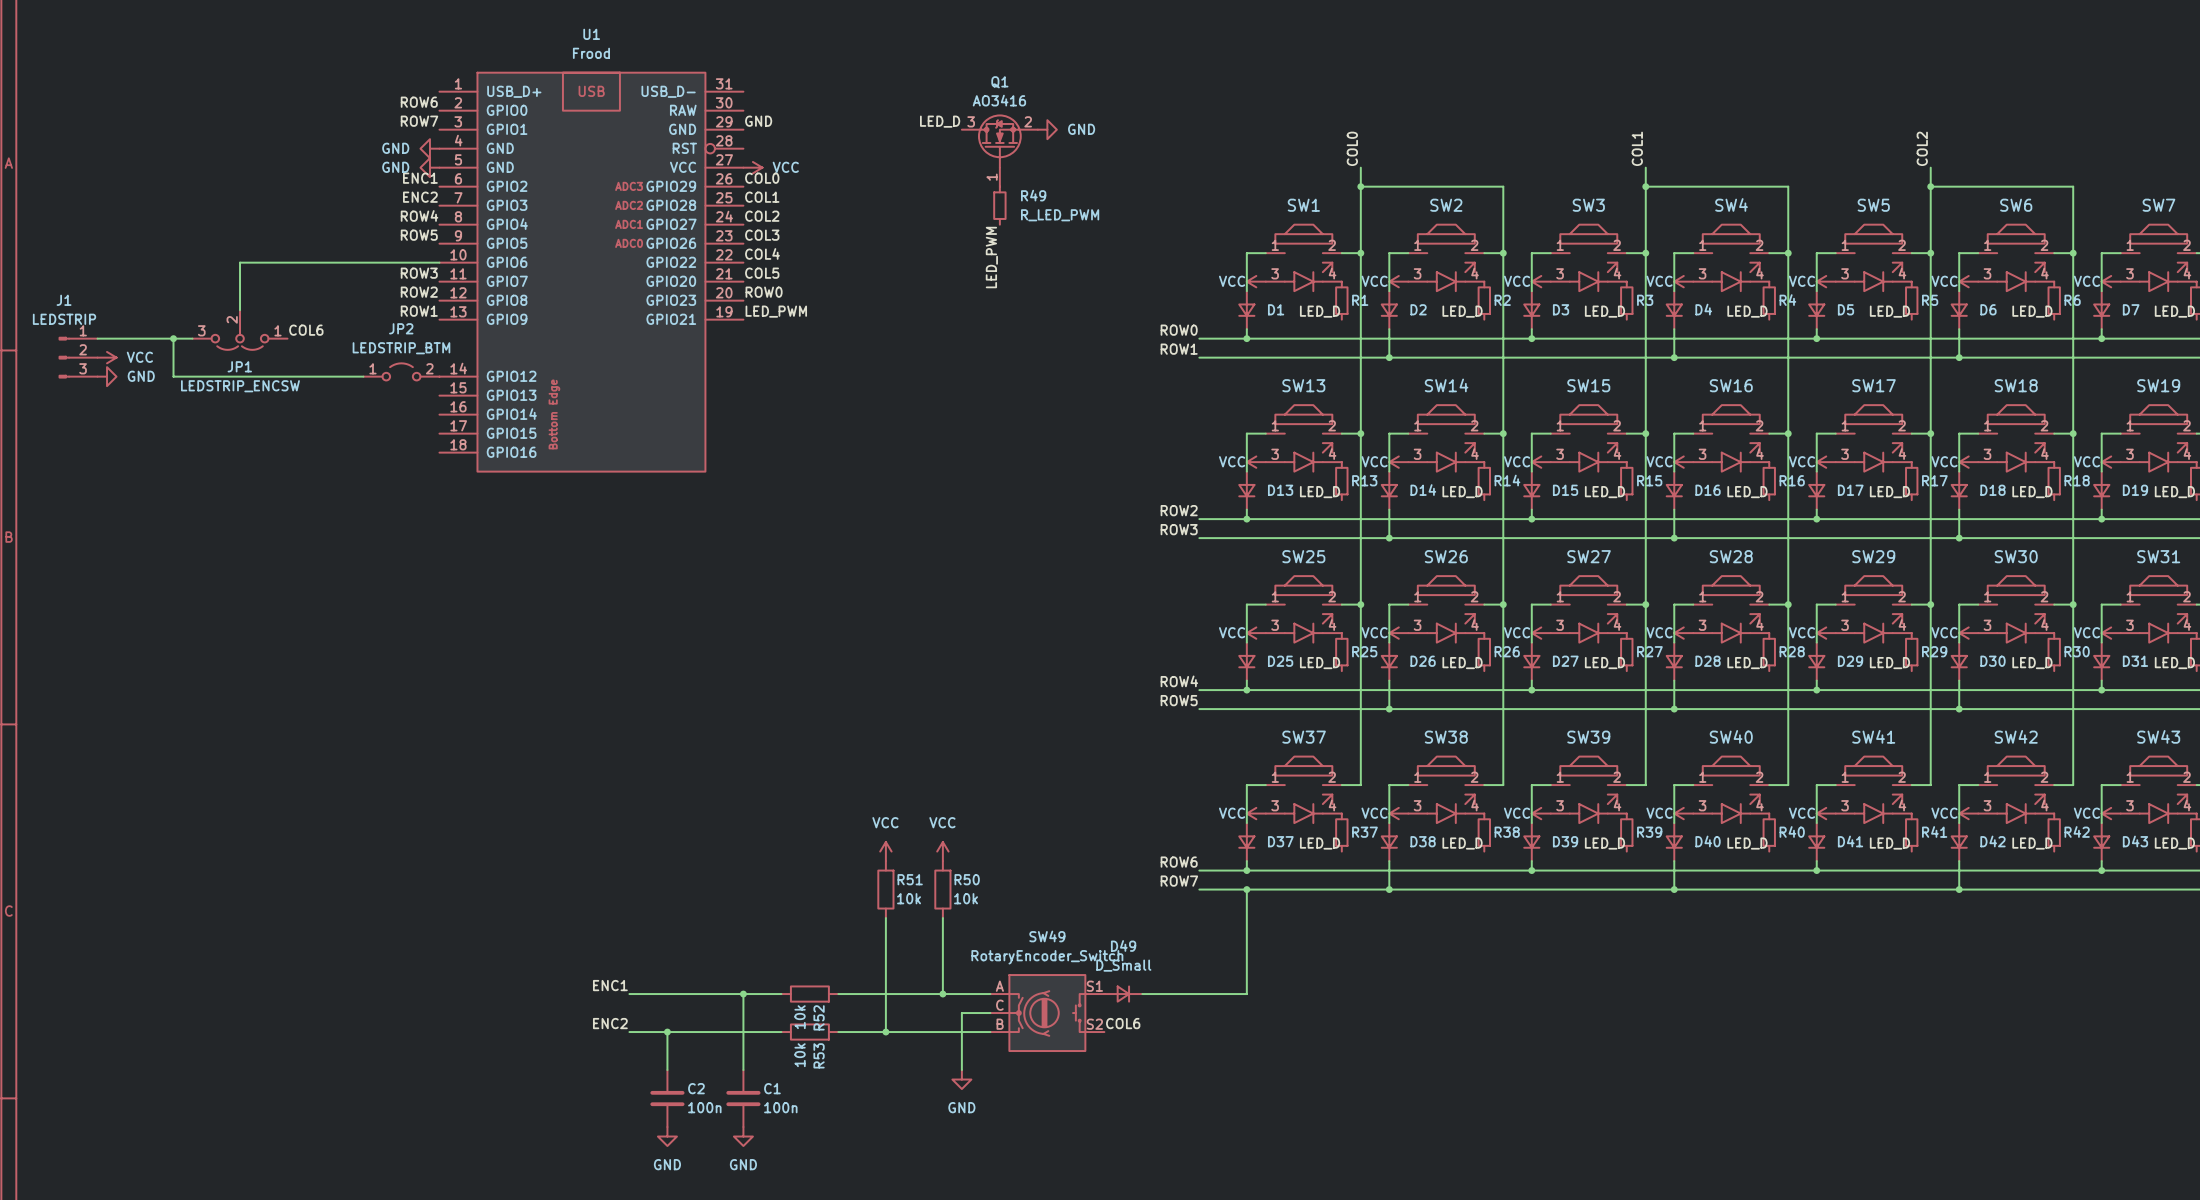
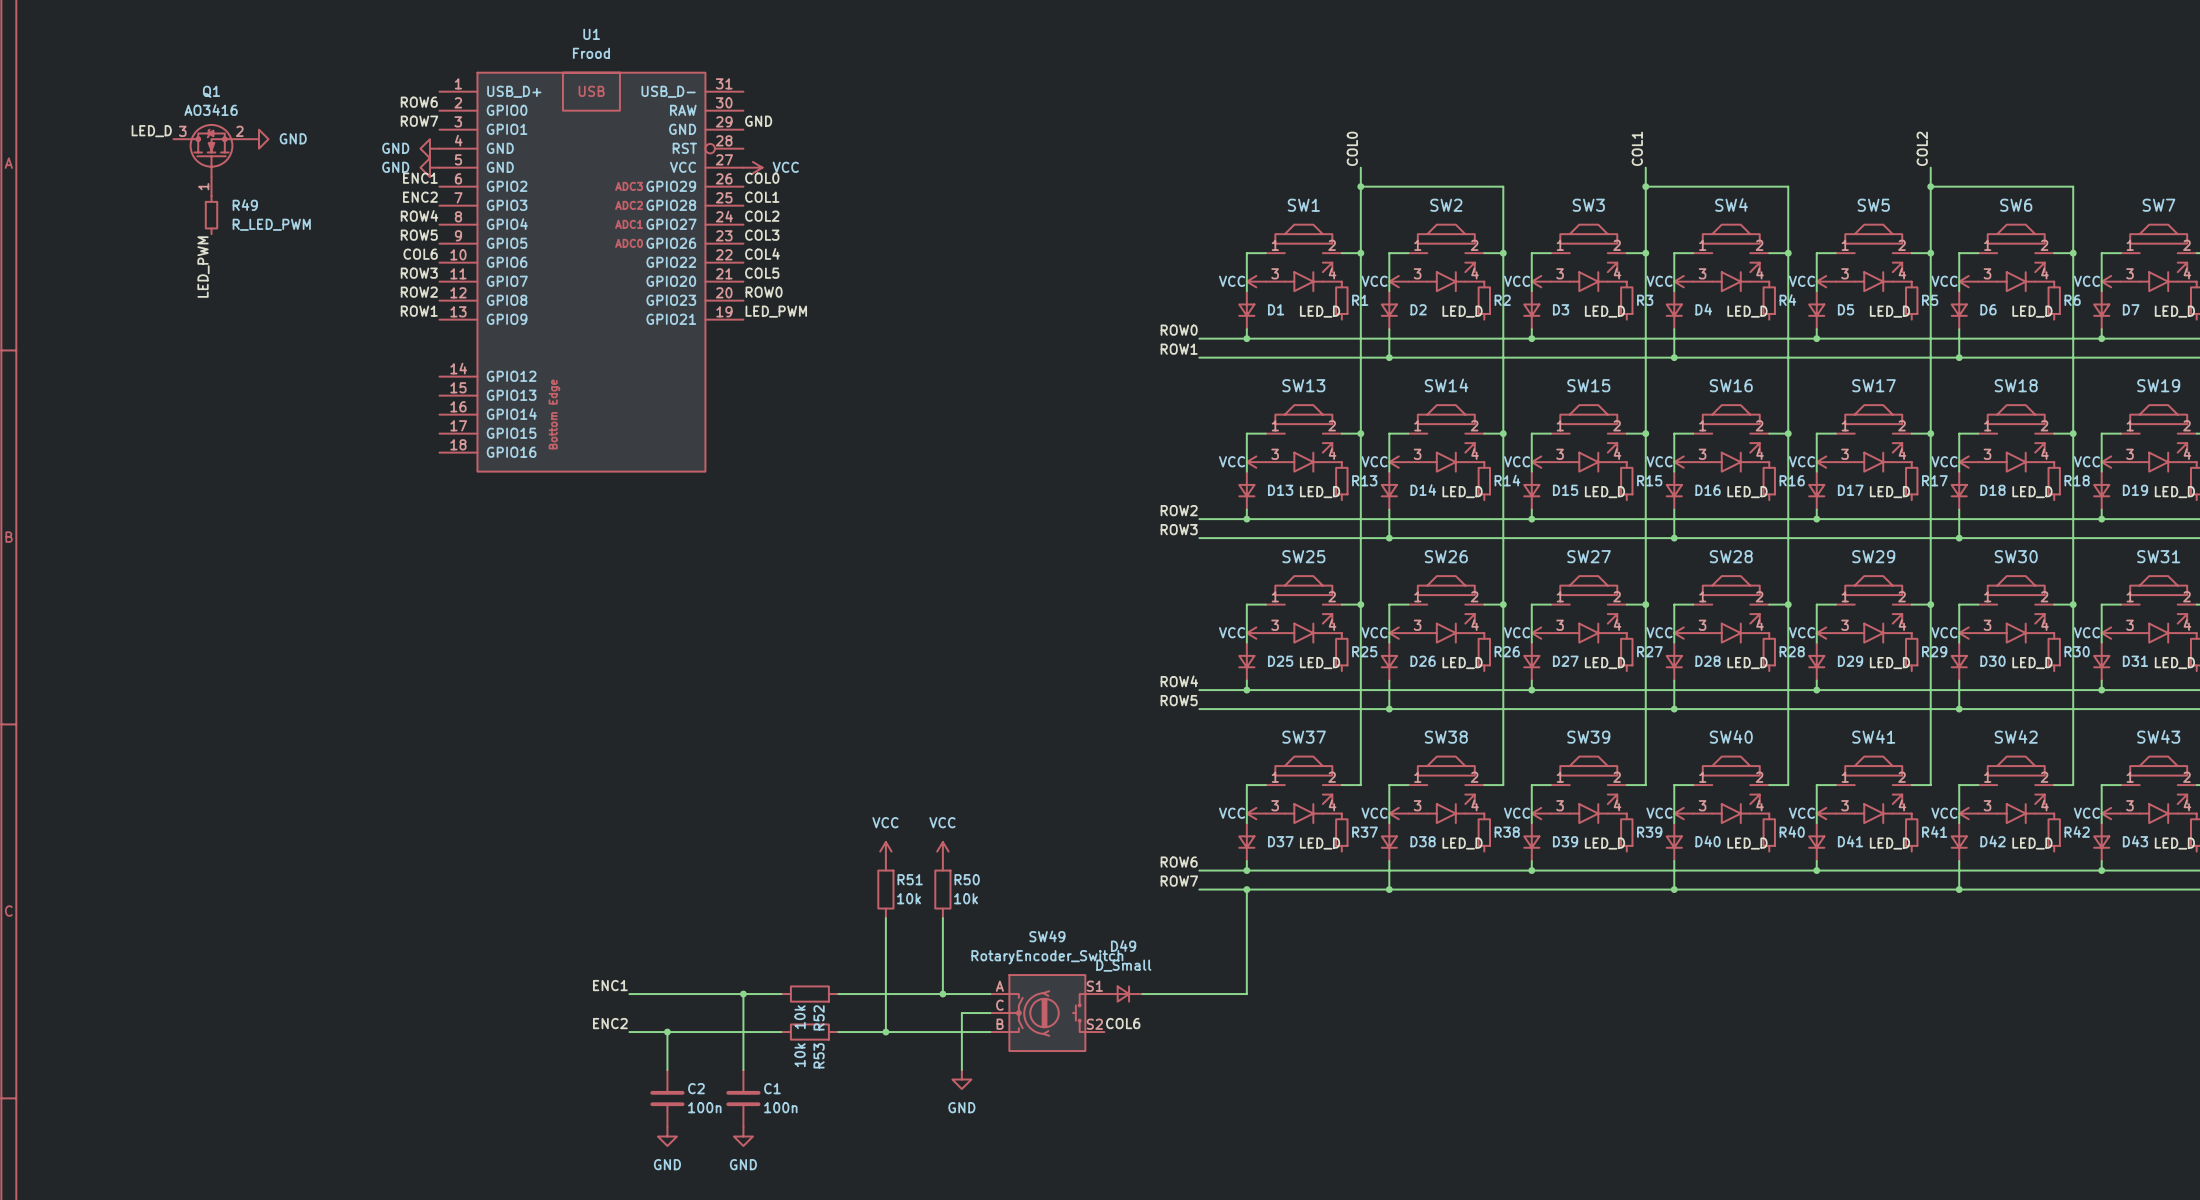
label: LED_D (940, 121) -> none
power symbol: GND (1047, 129) -> none
label: none -> LED_D (151, 131)
power symbol: none -> GND (259, 139)
Q1 position: (999, 150) -> (211, 160)
R49 position: (999, 205) -> (211, 215)
label: LED_PWM (991, 257) -> none
wire: (439, 262) (240, 262) (240, 310) -> none
label: none -> LED_PWM (203, 267)
JP1: LEDSTRIP_ENCSW (240, 330) -> none
label position: COL6 (306, 330) -> COL6 (420, 254)
wire: (97, 338) (192, 338) -> none
wire: (173, 338) (173, 376) (363, 376) -> none
junction: (173, 338) -> none
J1: LEDSTRIP (78, 357) -> none
power symbol: VCC (107, 357) -> none
JP2: LEDSTRIP_BTM (401, 371) -> none
power symbol: GND (107, 376) -> none

